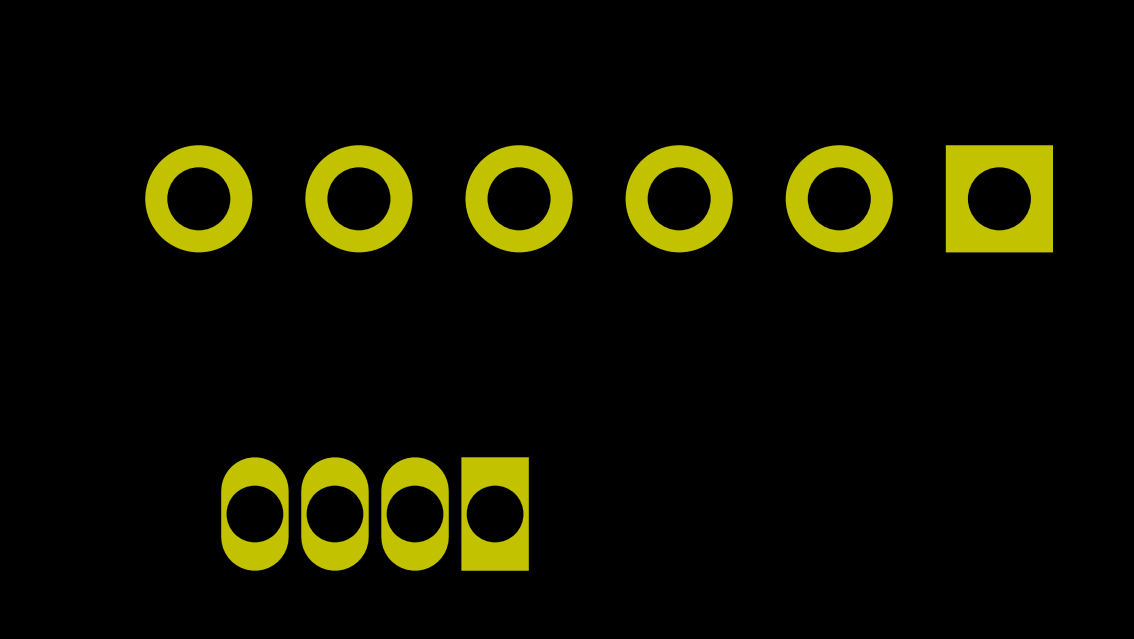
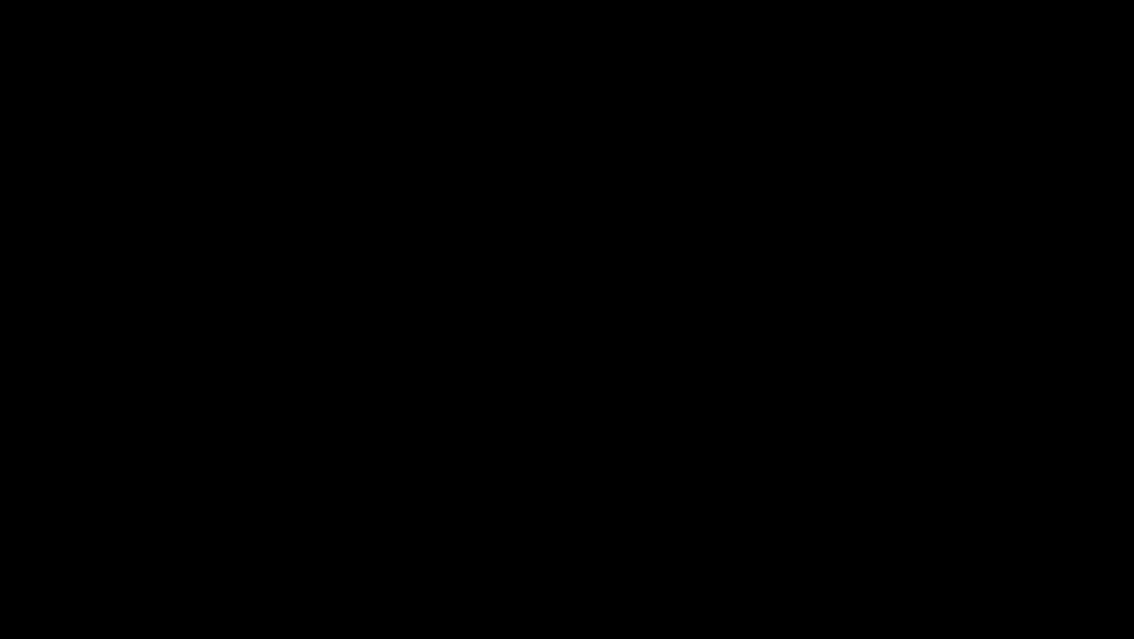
part: (599, 198) -> none
part: (375, 514) -> none

